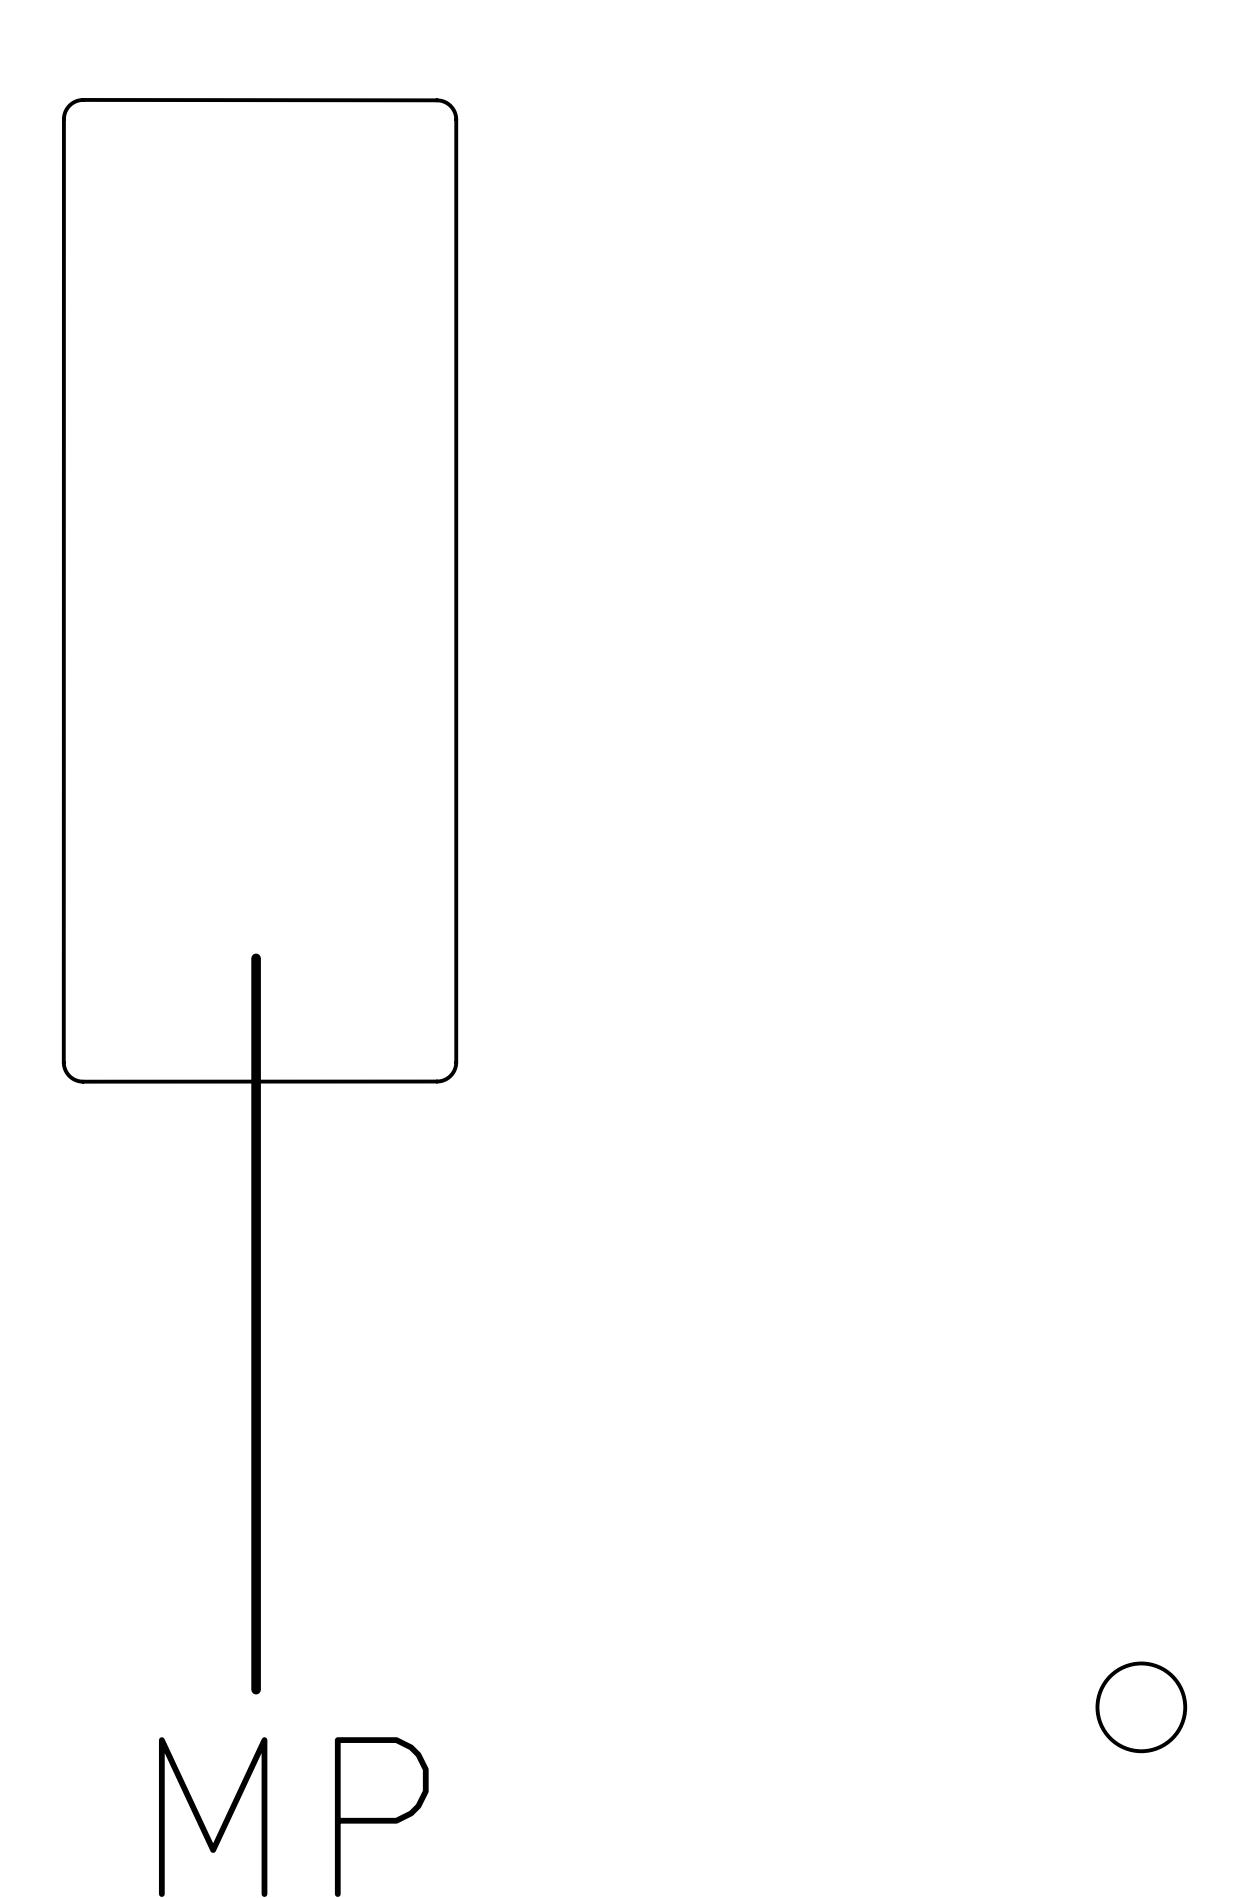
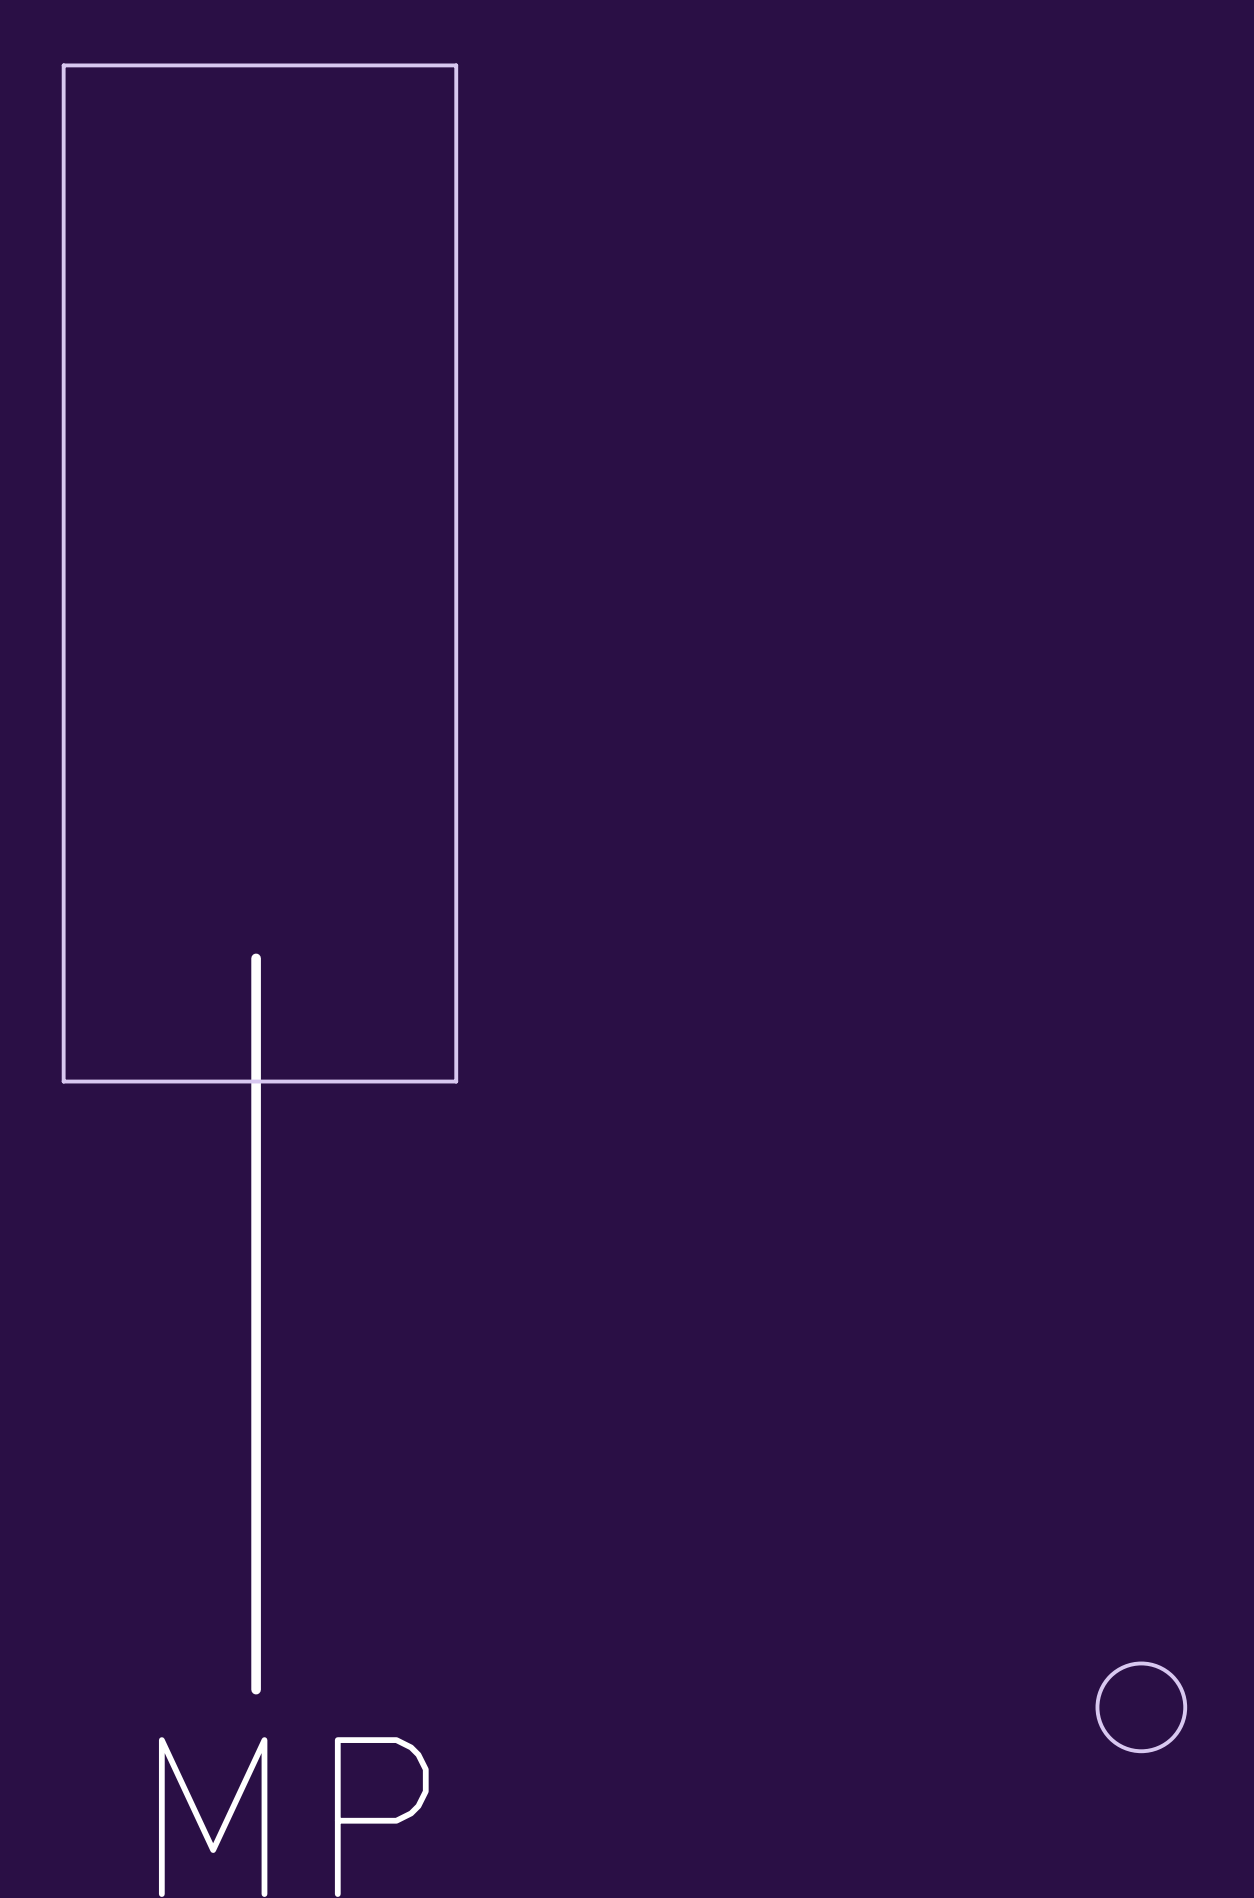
board edge: (456, 119) (450, 105) (437, 100) (83, 99) (71, 103) (65, 111) (63, 1062) (69, 1076) (83, 1081) (437, 1081) (450, 1075) (456, 1062) -> (456, 119) (456, 65) (63, 65) (63, 1081) (456, 1081) (456, 1062)

